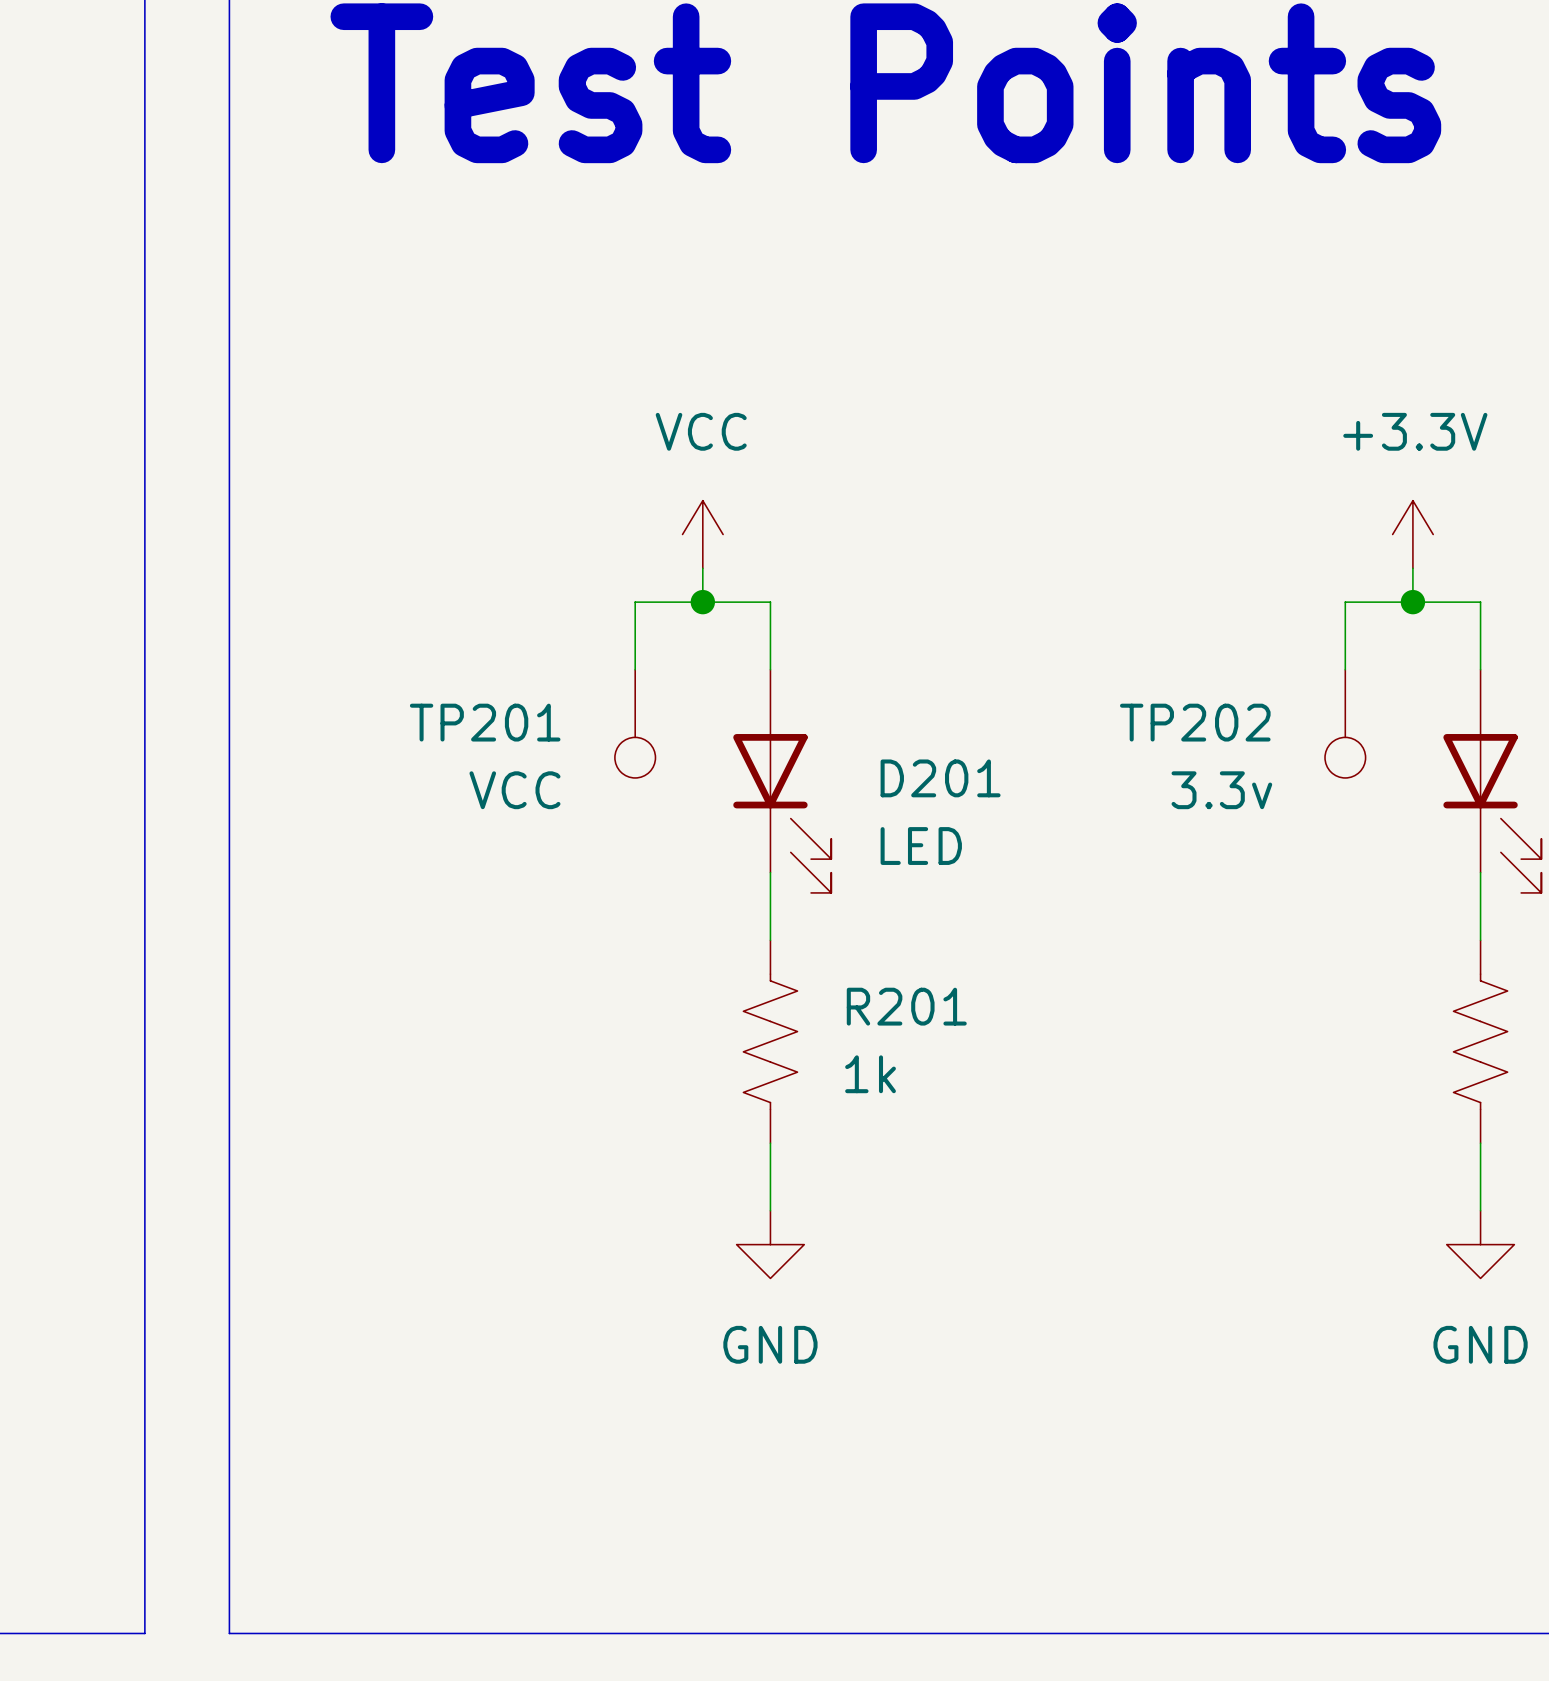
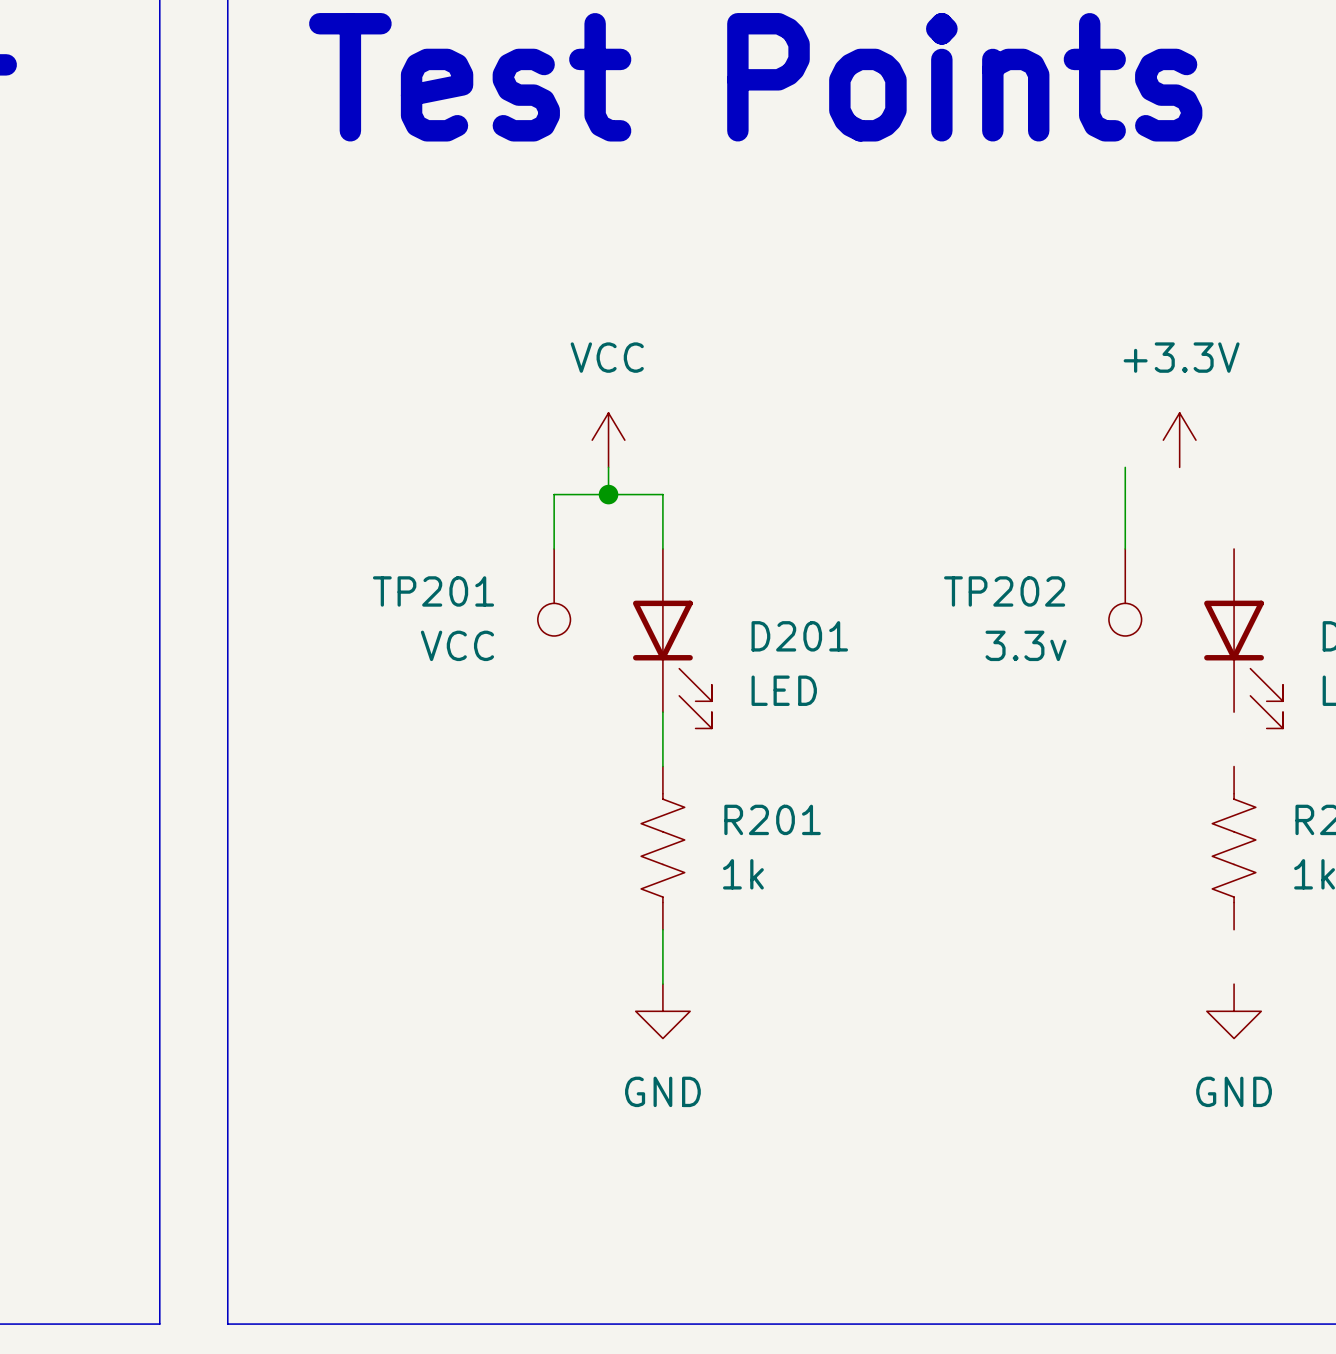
wire: (1412, 568) (1412, 602) -> none
wire: (1345, 602) (1480, 602) (1480, 669) -> (1125, 494) (1125, 467)
junction: (1412, 602) -> none
wire: (1480, 872) (1480, 940) -> none
wire: (1480, 1143) (1480, 1210) -> none

